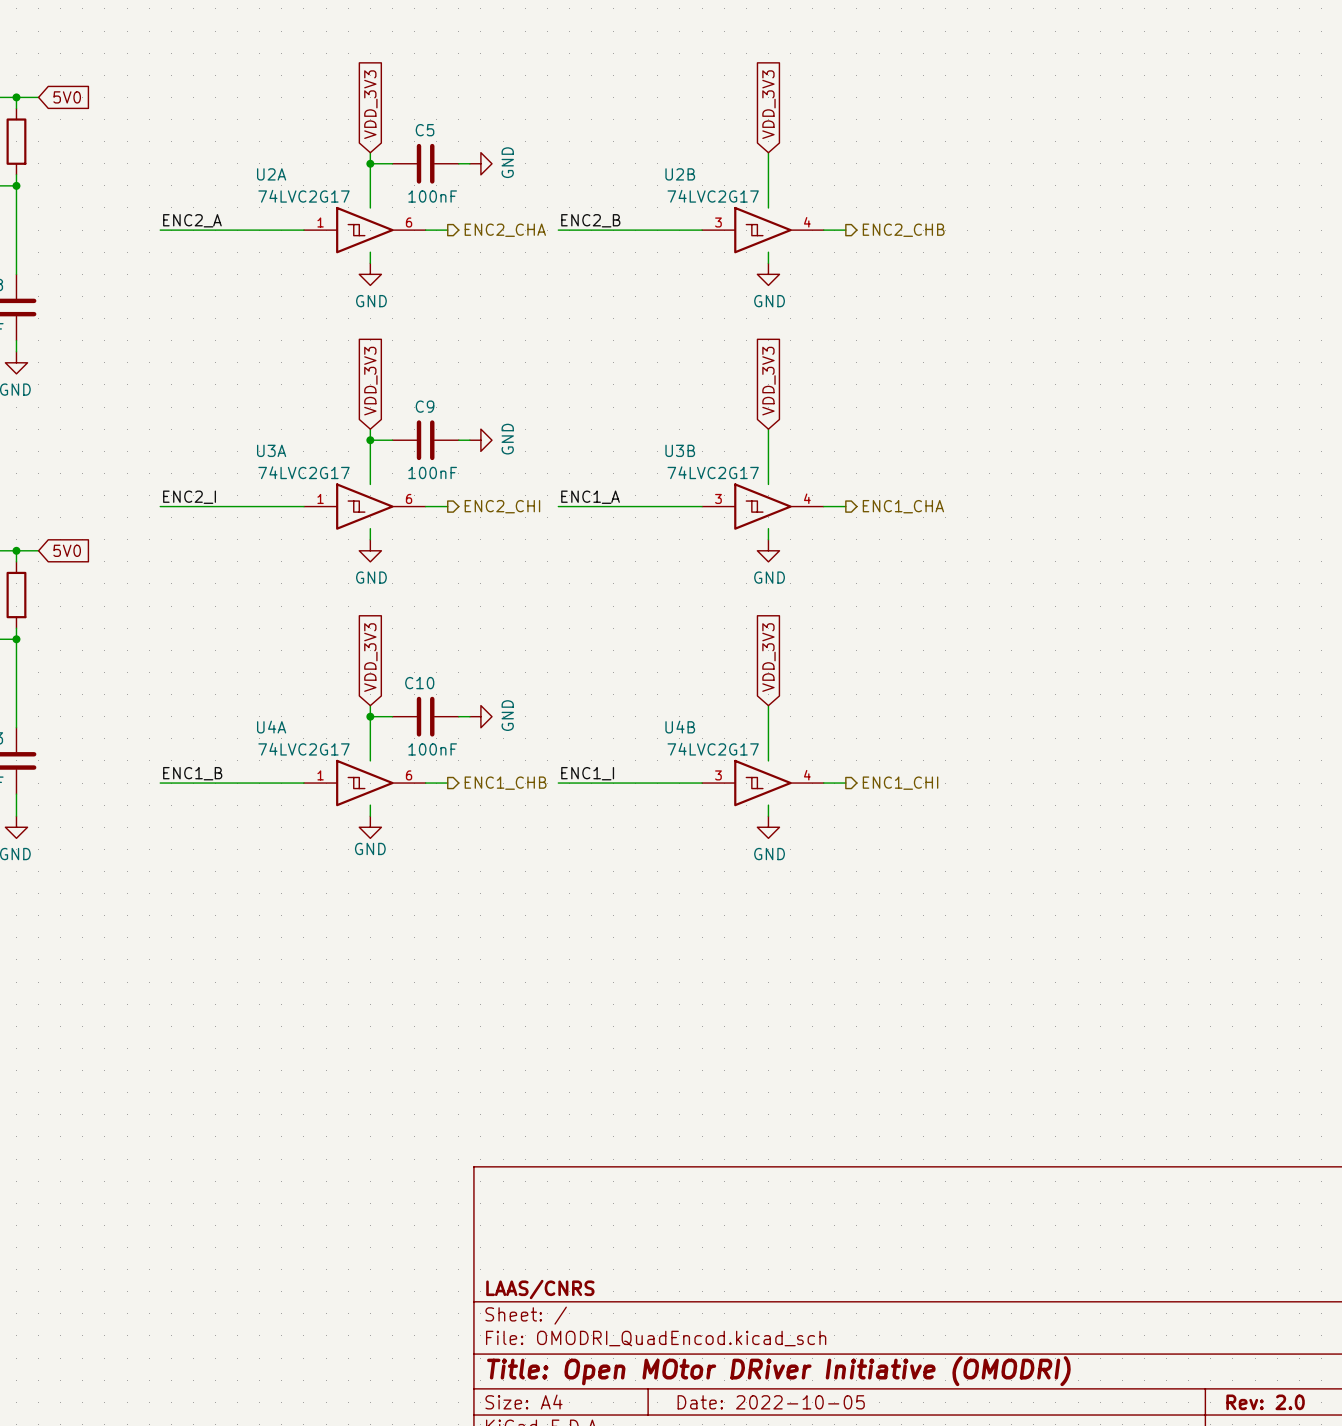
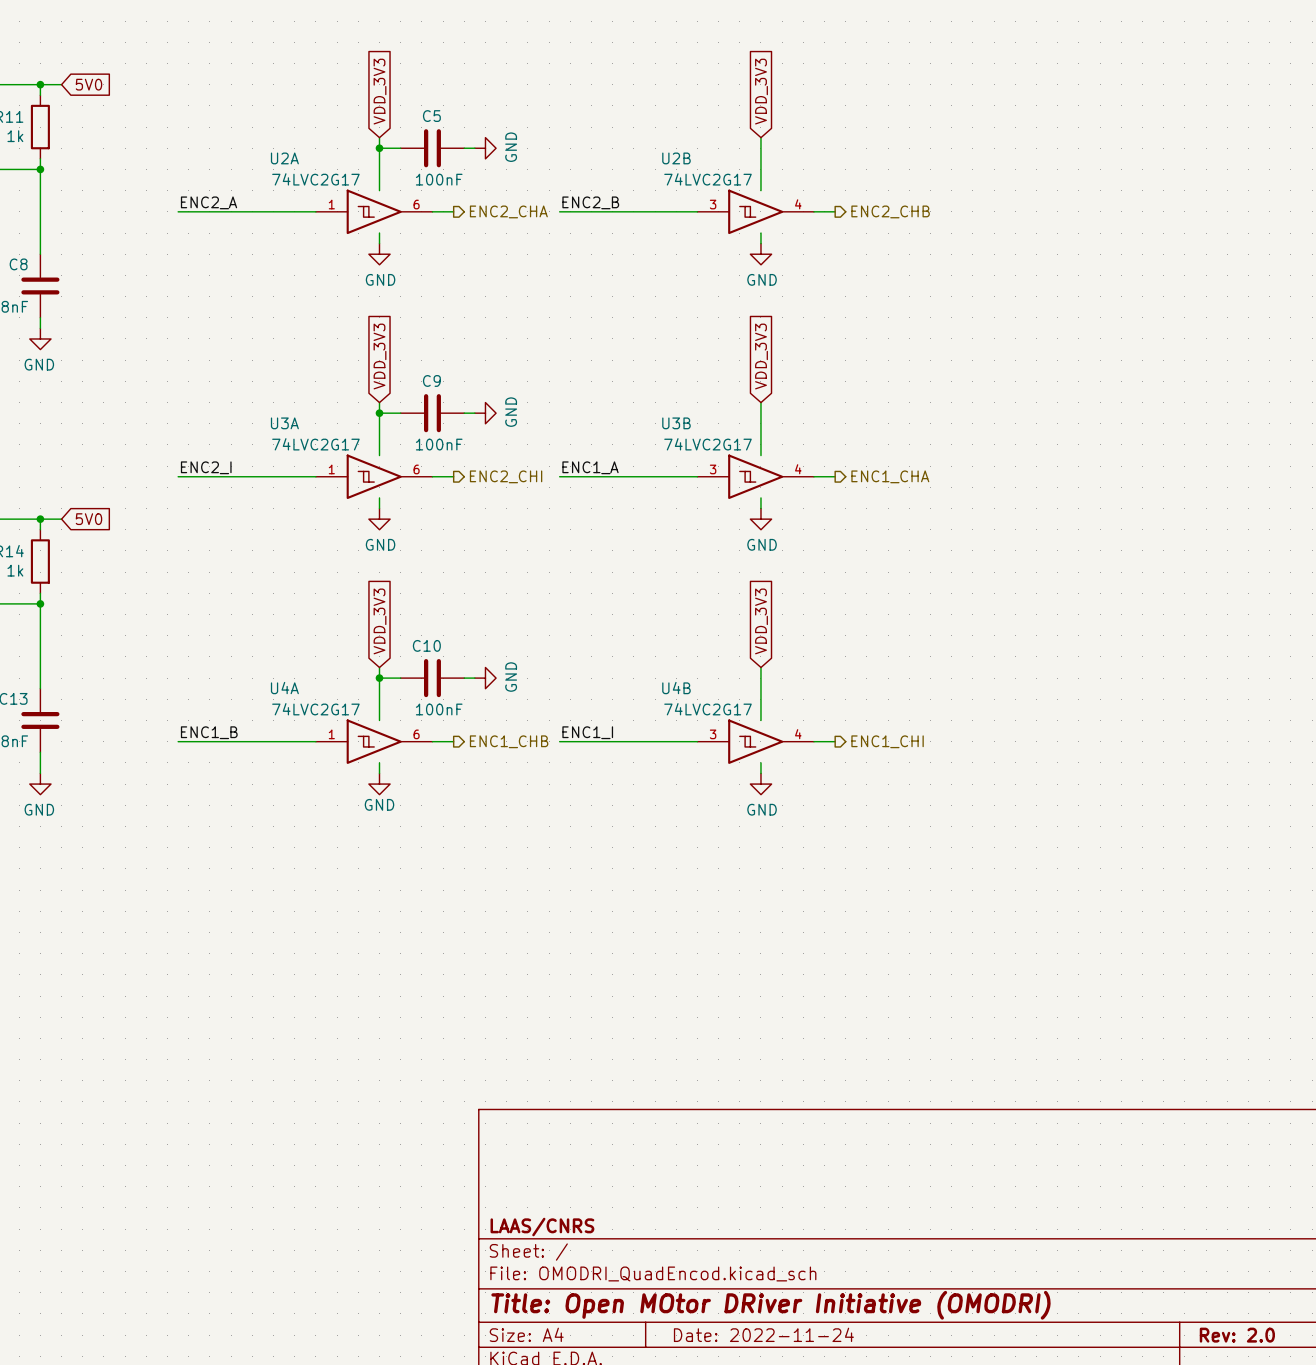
title block: Date: 2022-10-05 (771, 1402) -> Date: 2022-11-24 (763, 1334)

